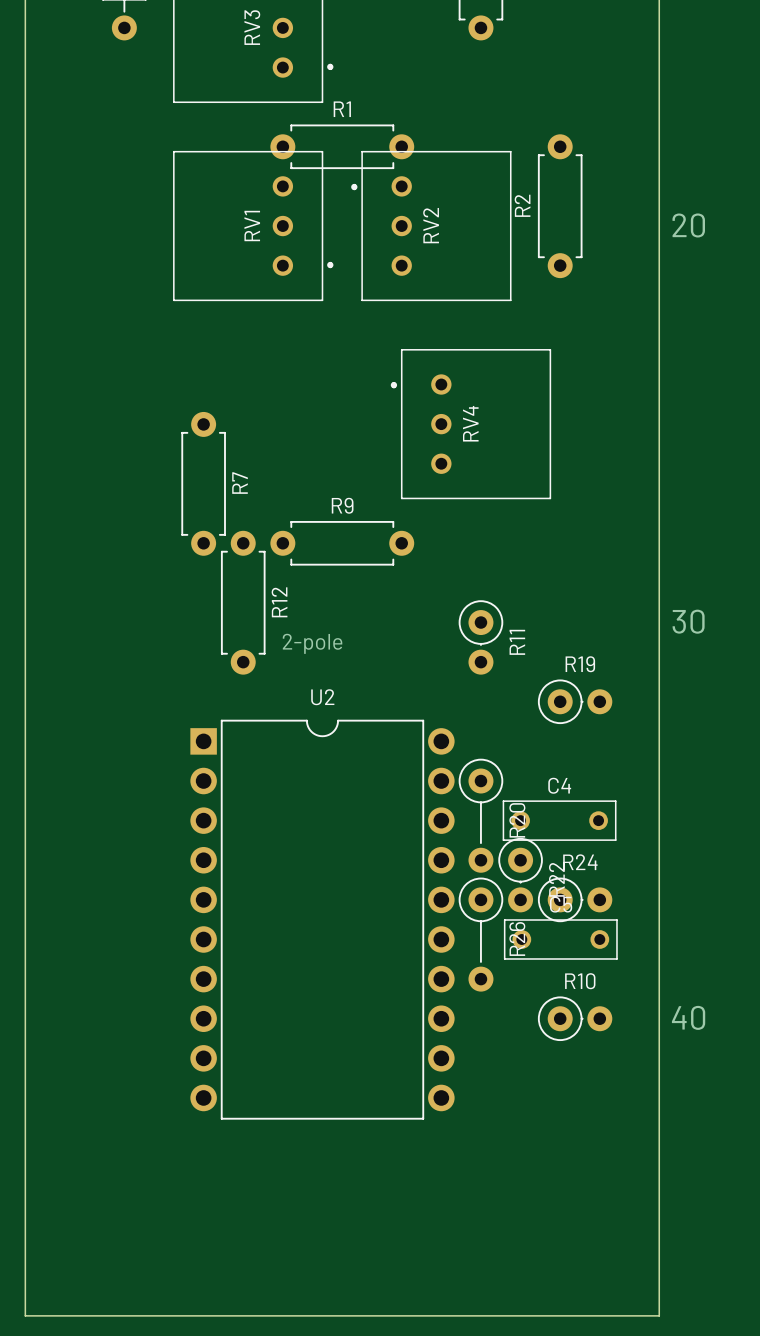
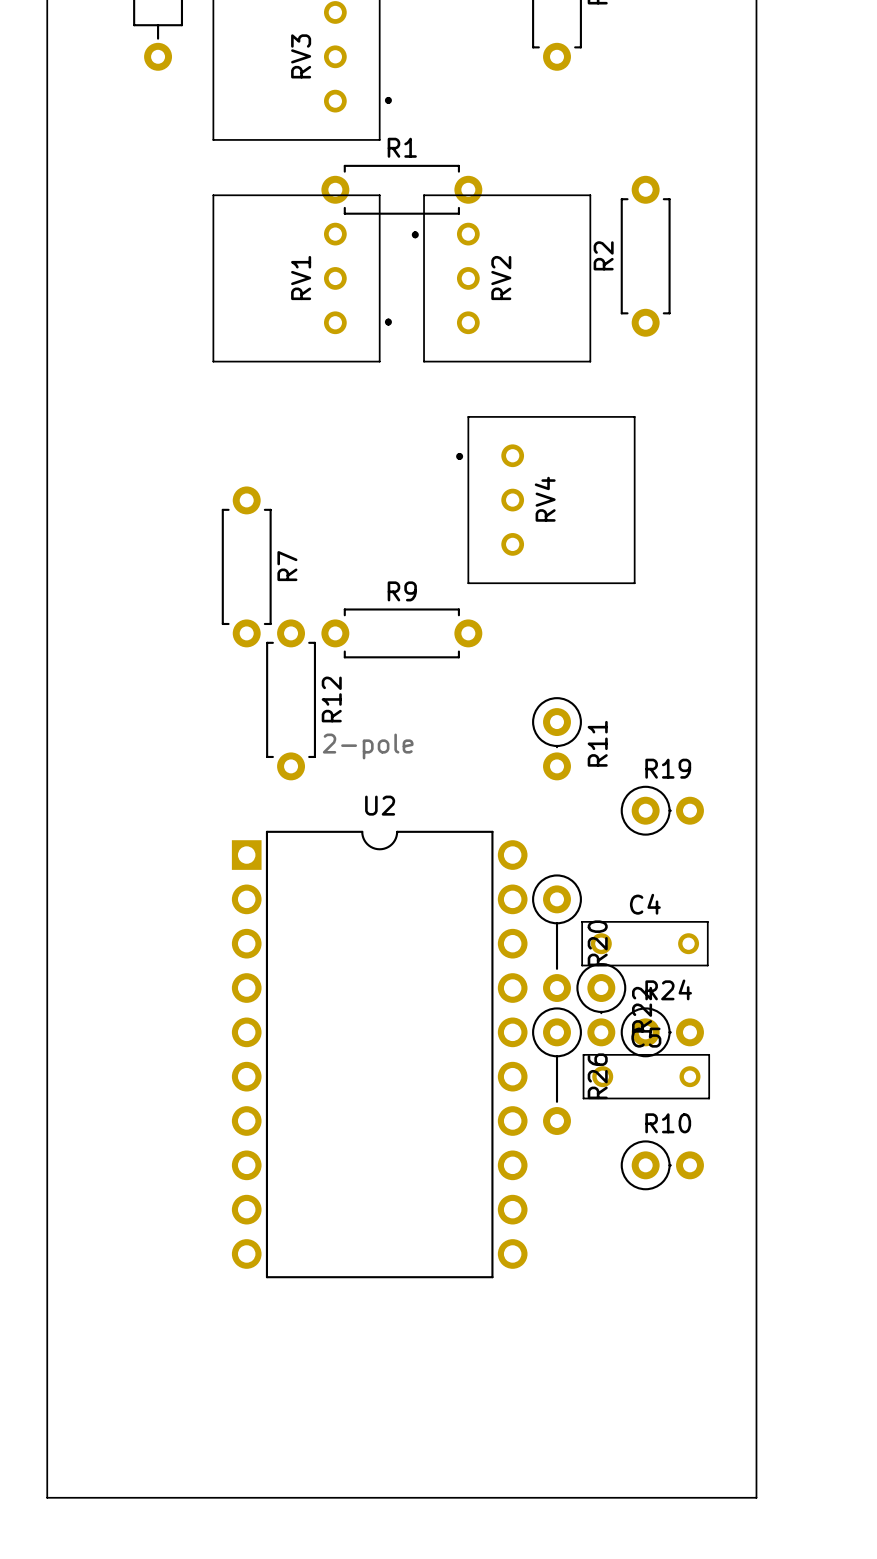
text: 20 (688, 225) -> none
text: 30 (688, 621) -> none
text: 40 (688, 1017) -> none

